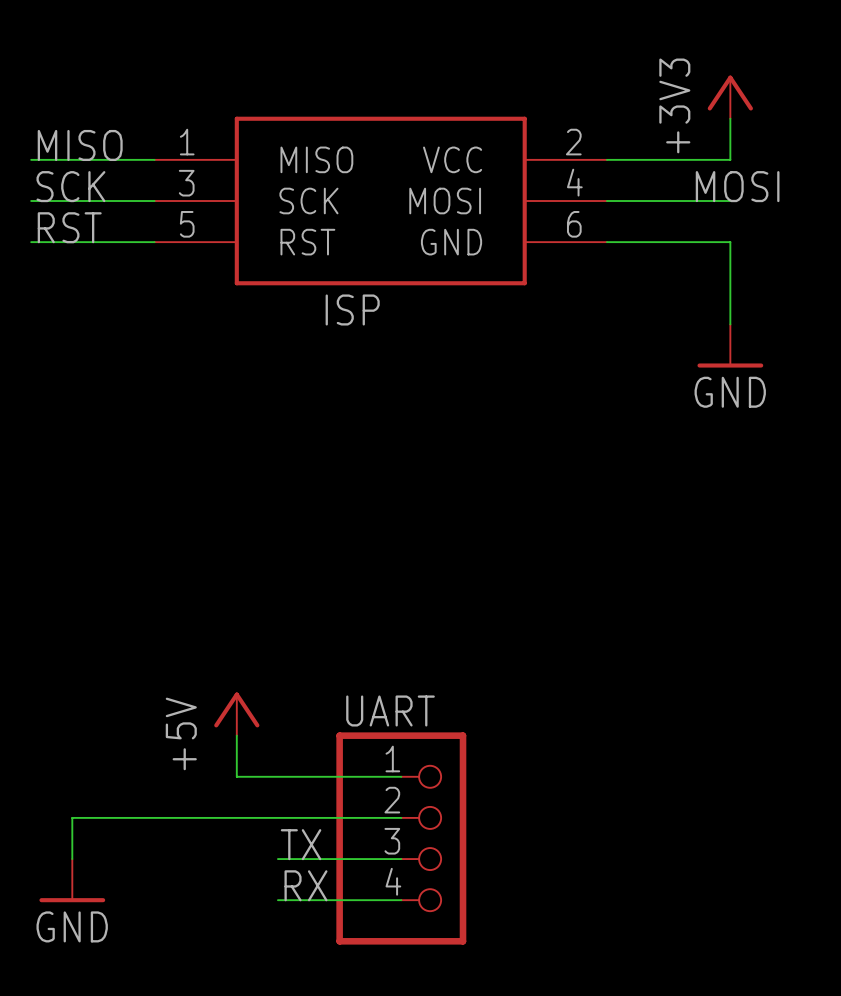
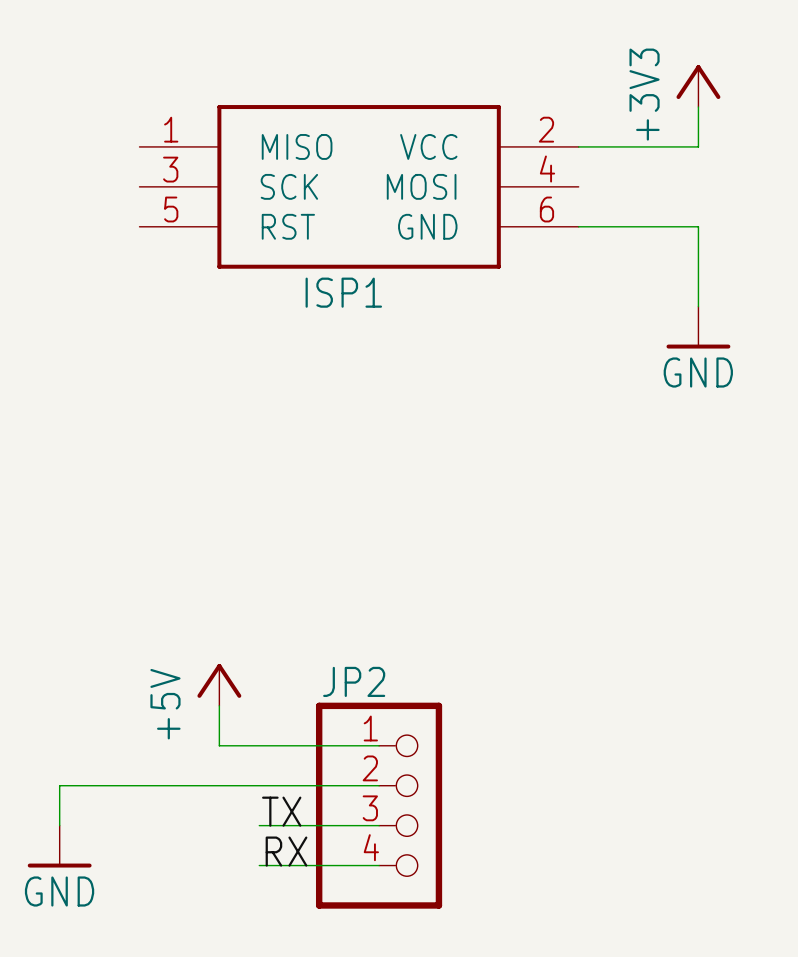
label: MISO (80, 145) -> none
wire: (31, 159) (154, 159) -> none
label: SCK (70, 186) -> none
label: MOSI (737, 186) -> none
wire: (31, 201) (154, 201) -> none
wire: (606, 201) (730, 201) -> none
label: RST (69, 227) -> none
wire: (31, 242) (154, 242) -> none
ISP name: ISP (352, 309) -> ISP1 (343, 292)
UART name: UART (390, 710) -> JP2 (354, 681)

